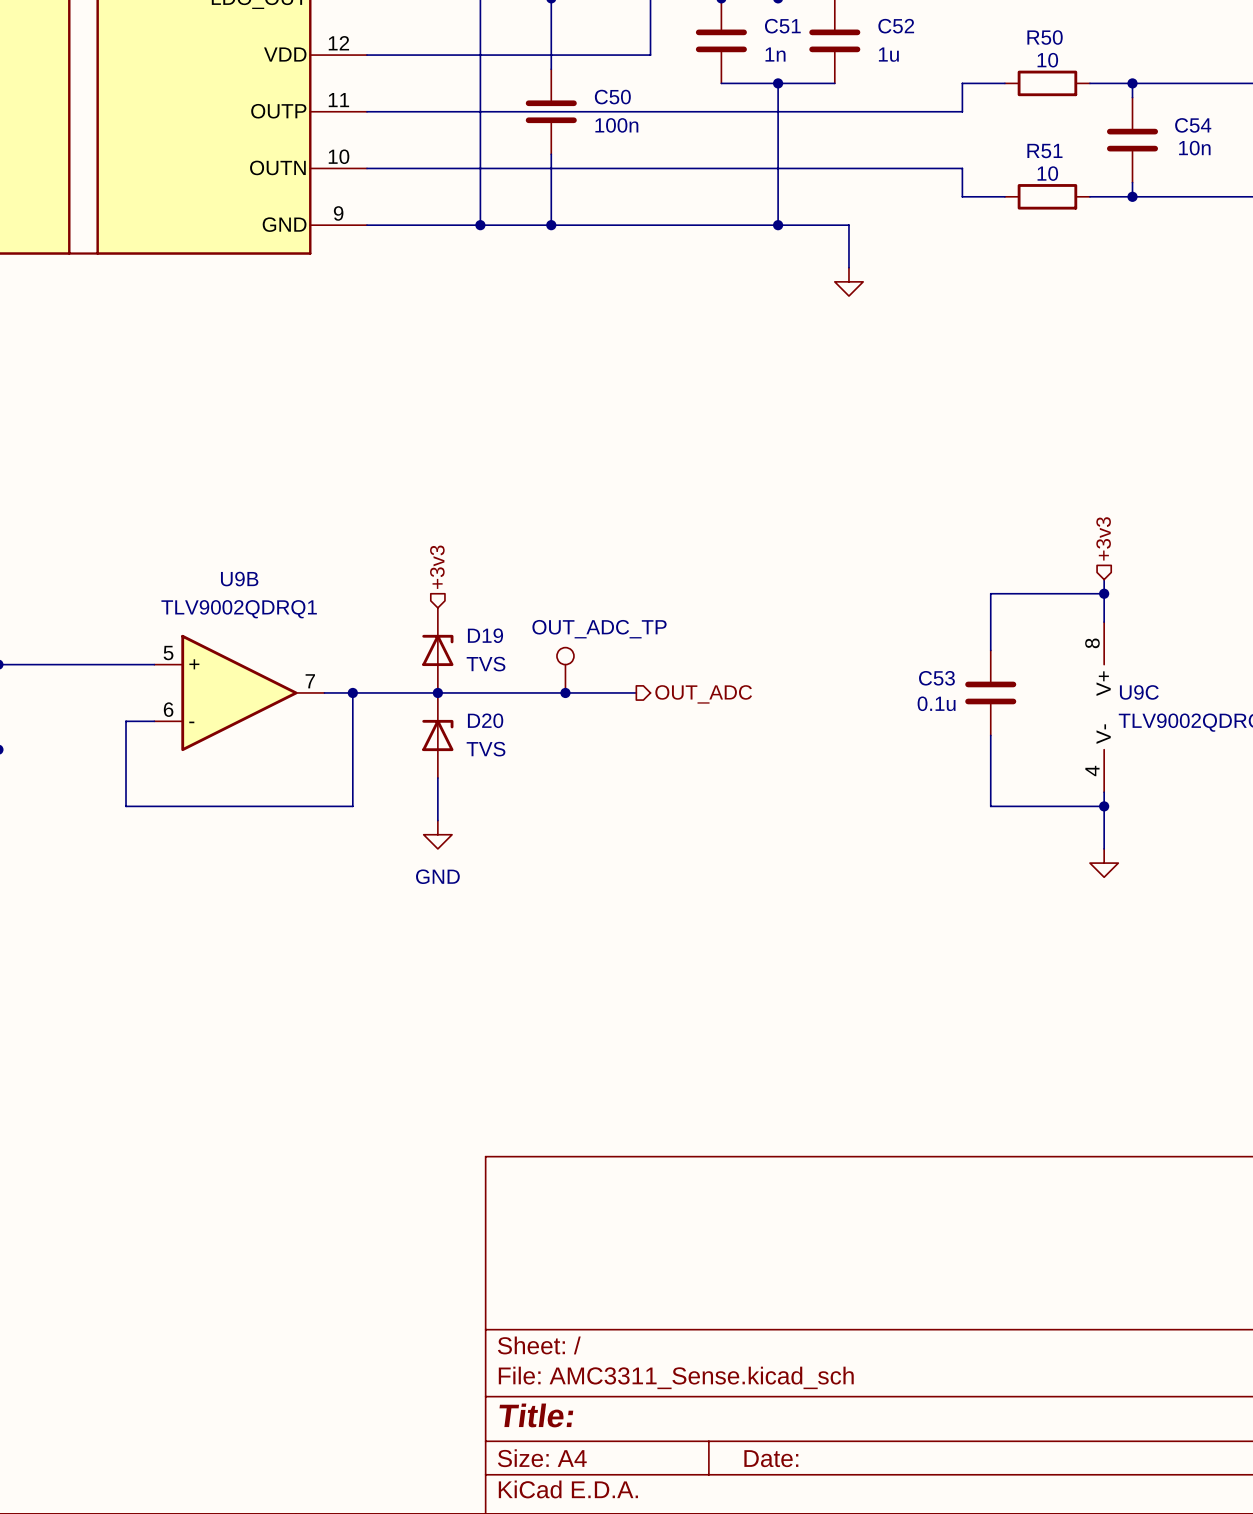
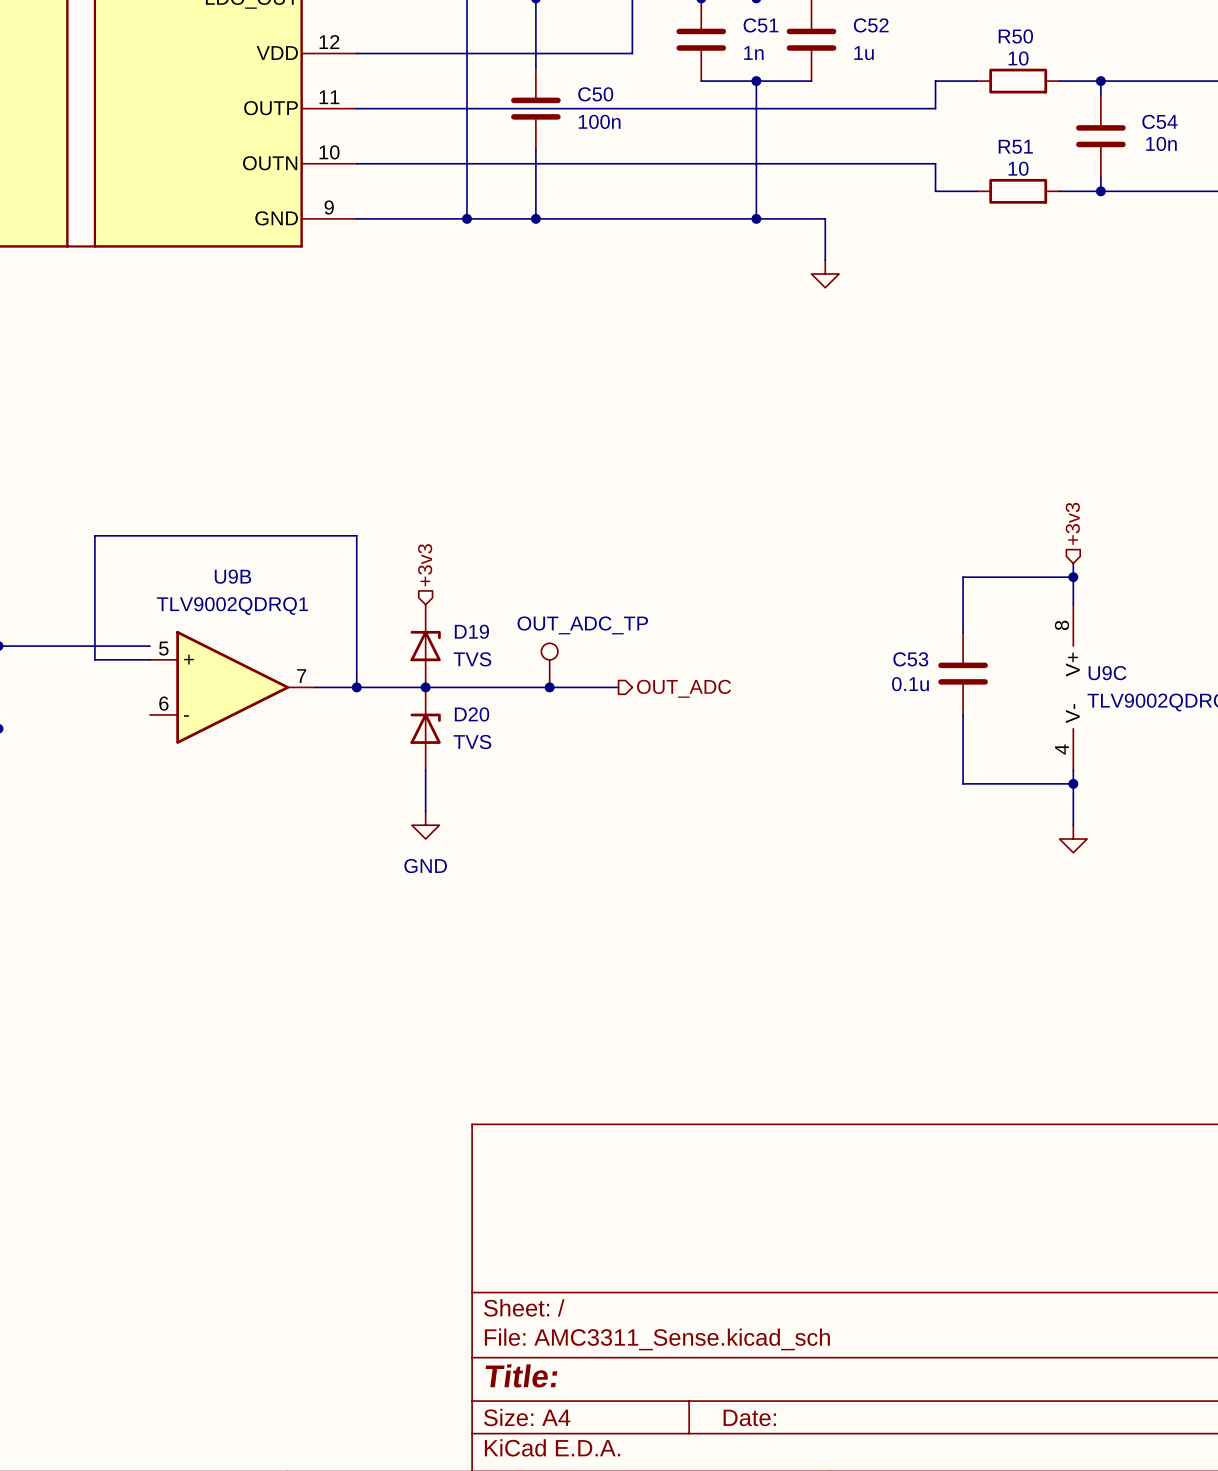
hierarchical label position: +3v3 (437, 567) -> +3v3 (425, 565)
D19 position: (437, 650) -> (425, 646)
part position: (565, 670) -> (549, 665)
wire: none -> (150, 659) (94, 659) (94, 535) (356, 535) (356, 687)
U9B position: (239, 692) -> (232, 687)
wire: (324, 692) (636, 692) -> (315, 687) (618, 687)
wire: (352, 692) (352, 806) (126, 806) (126, 721) (154, 721) -> none
junction position: (352, 692) -> (356, 687)
junction position: (437, 692) -> (425, 687)
junction position: (565, 692) -> (549, 687)
hierarchical label position: OUT_ADC (703, 694) -> OUT_ADC (684, 688)
D20 position: (437, 735) -> (425, 728)
power symbol position: GND (437, 834) -> GND (425, 825)

